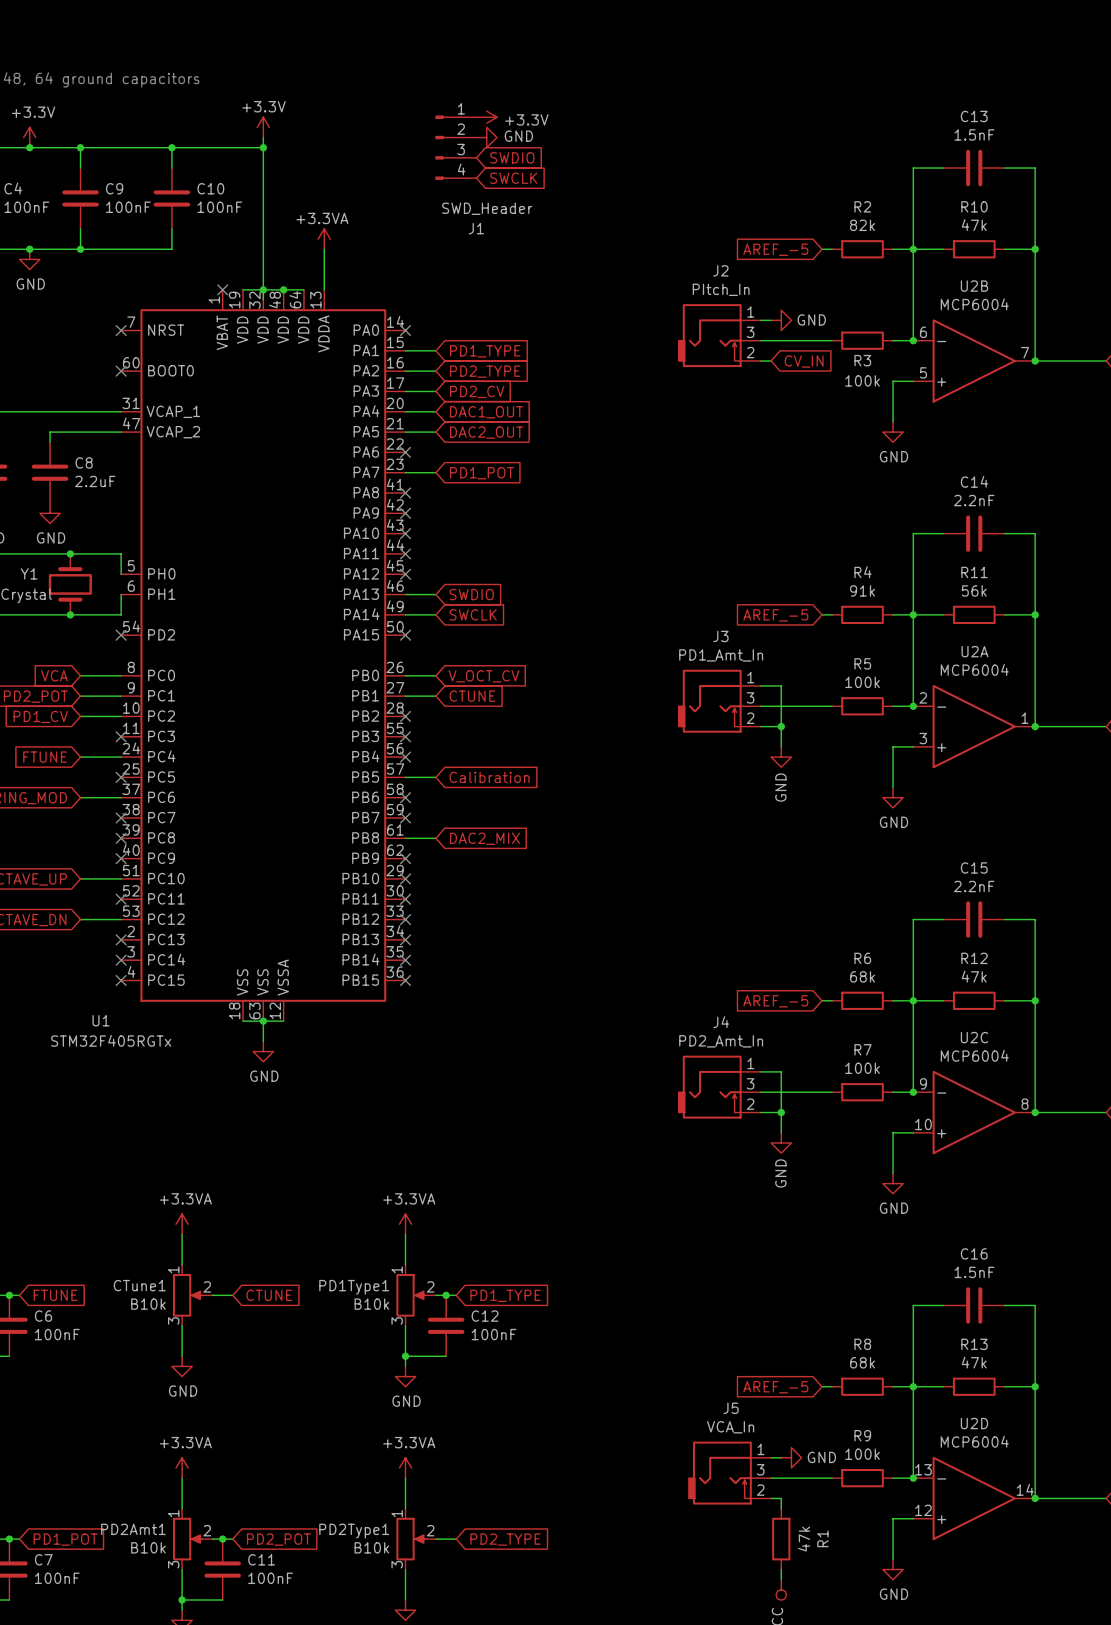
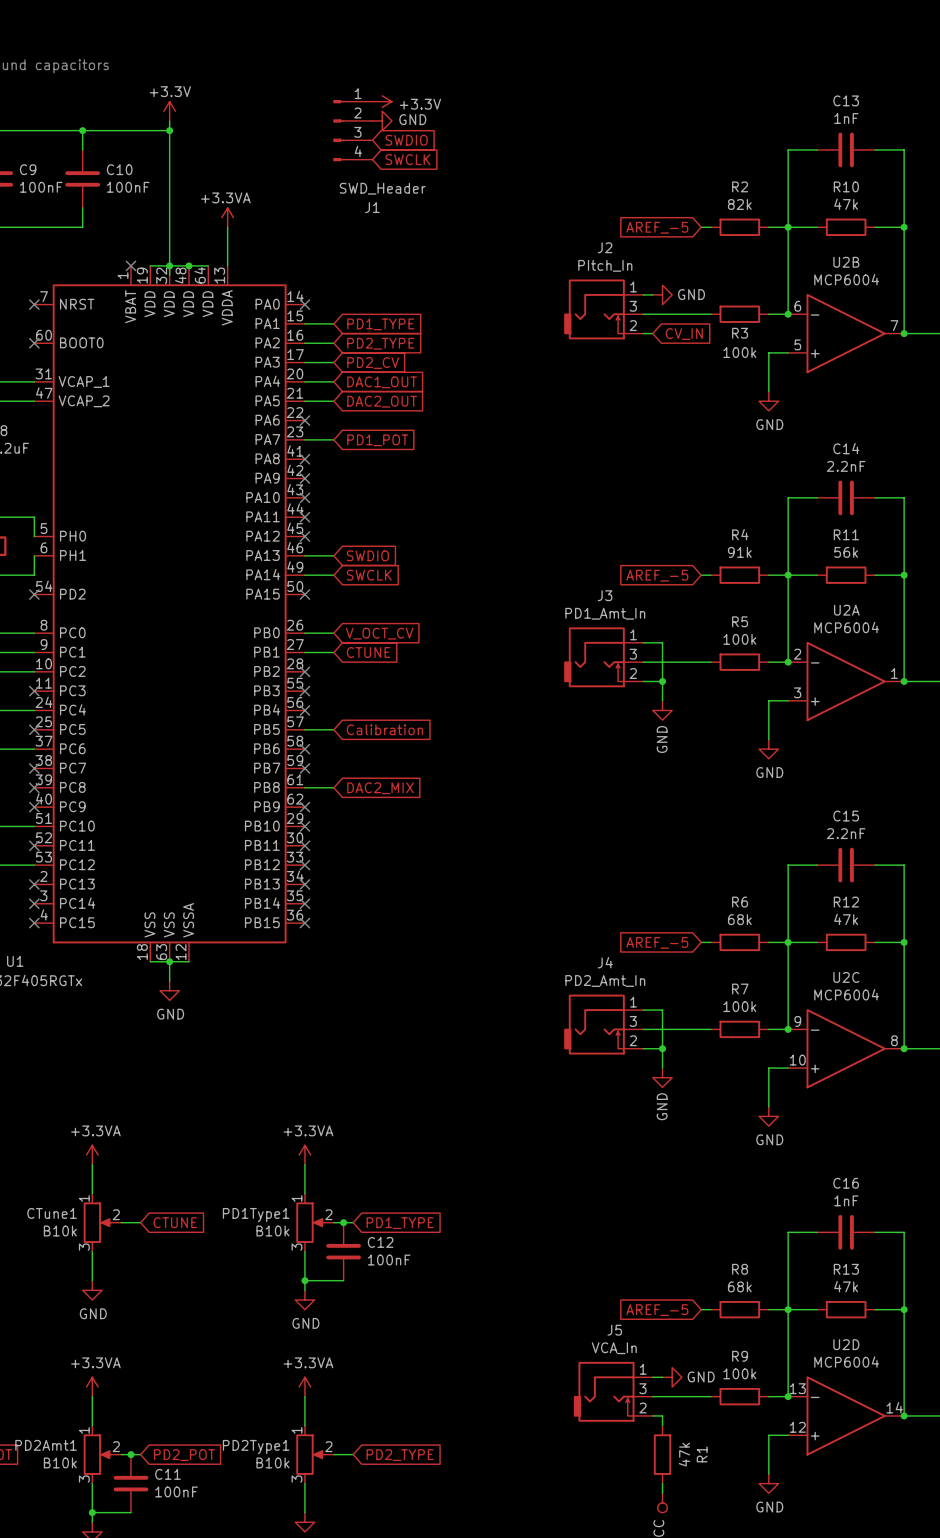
C13 value: 1.5nF (974, 134) -> 1nF (846, 118)
C16 value: 1.5nF (974, 1272) -> 1nF (846, 1200)

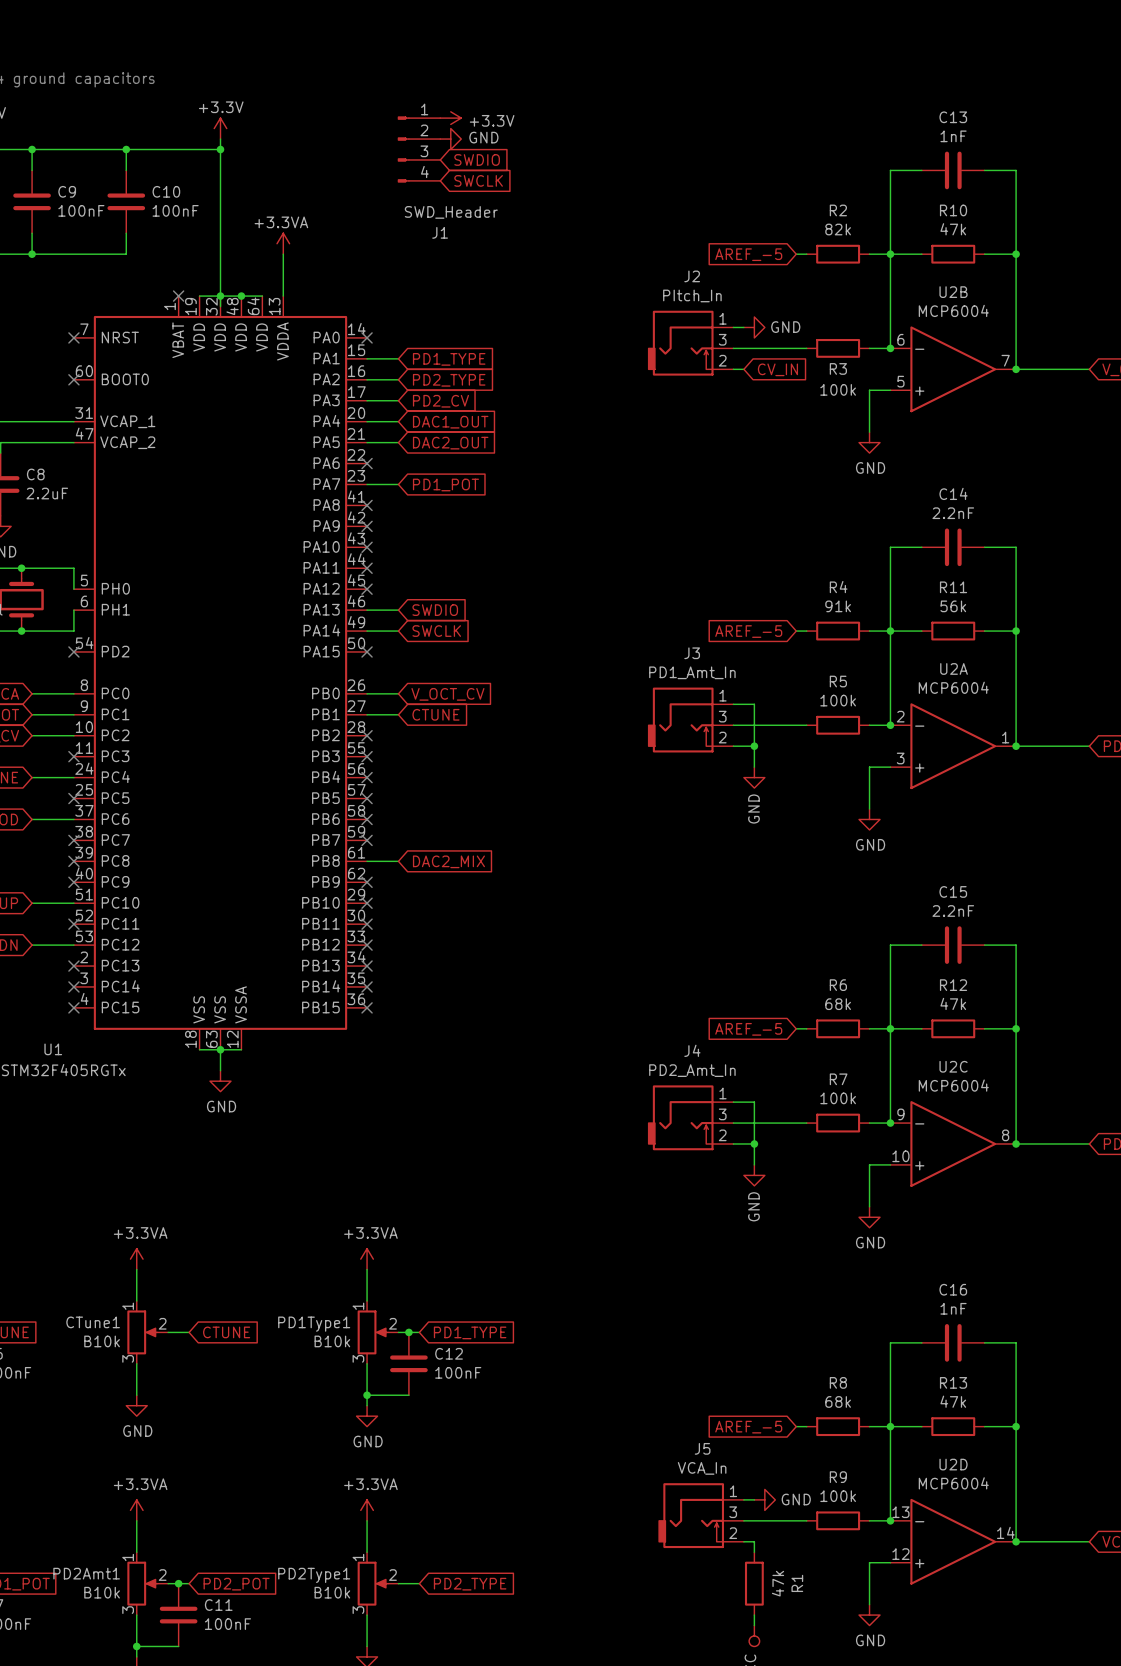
wire: (304, 729) (333, 729) -> none
no-connect mark: none -> (367, 798)
global label: Calibration (384, 729) -> none

